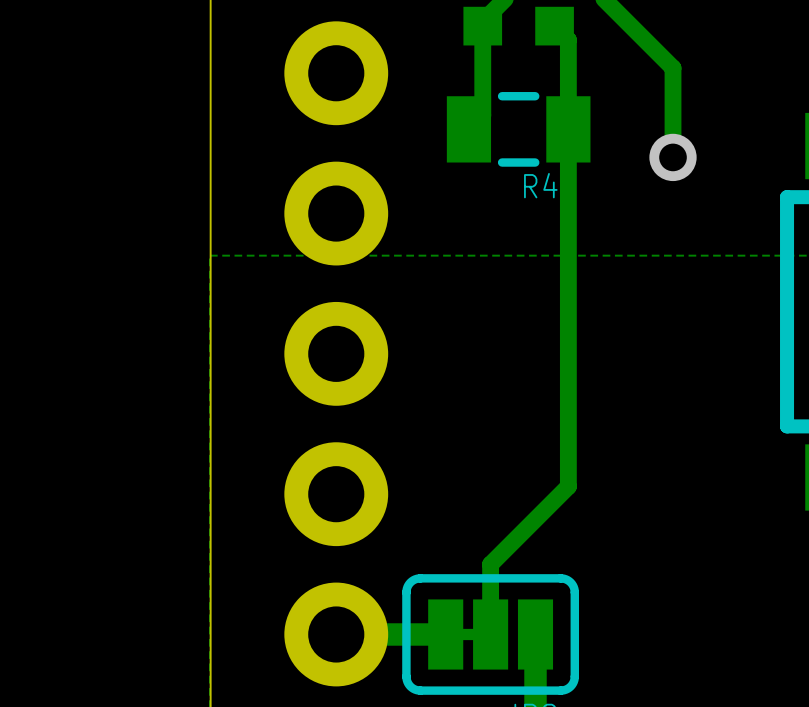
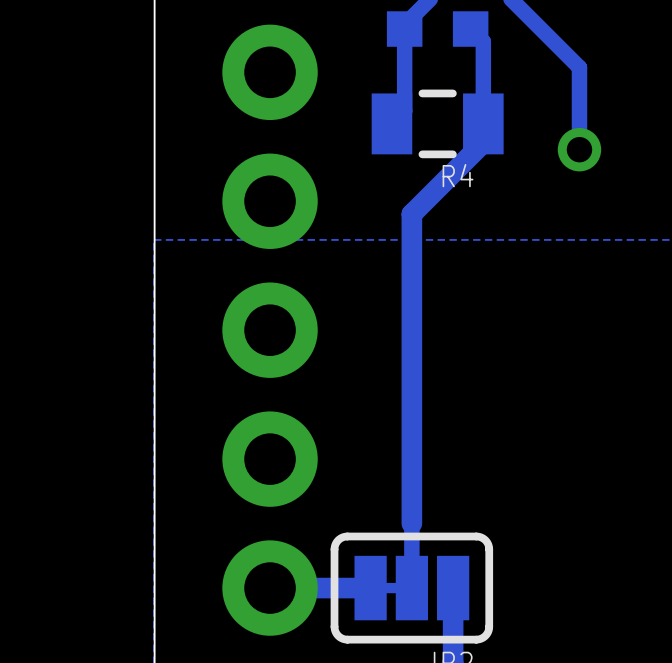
track: (568, 149) (568, 486) (490, 564) -> (483, 142) (411, 214) (411, 523)

